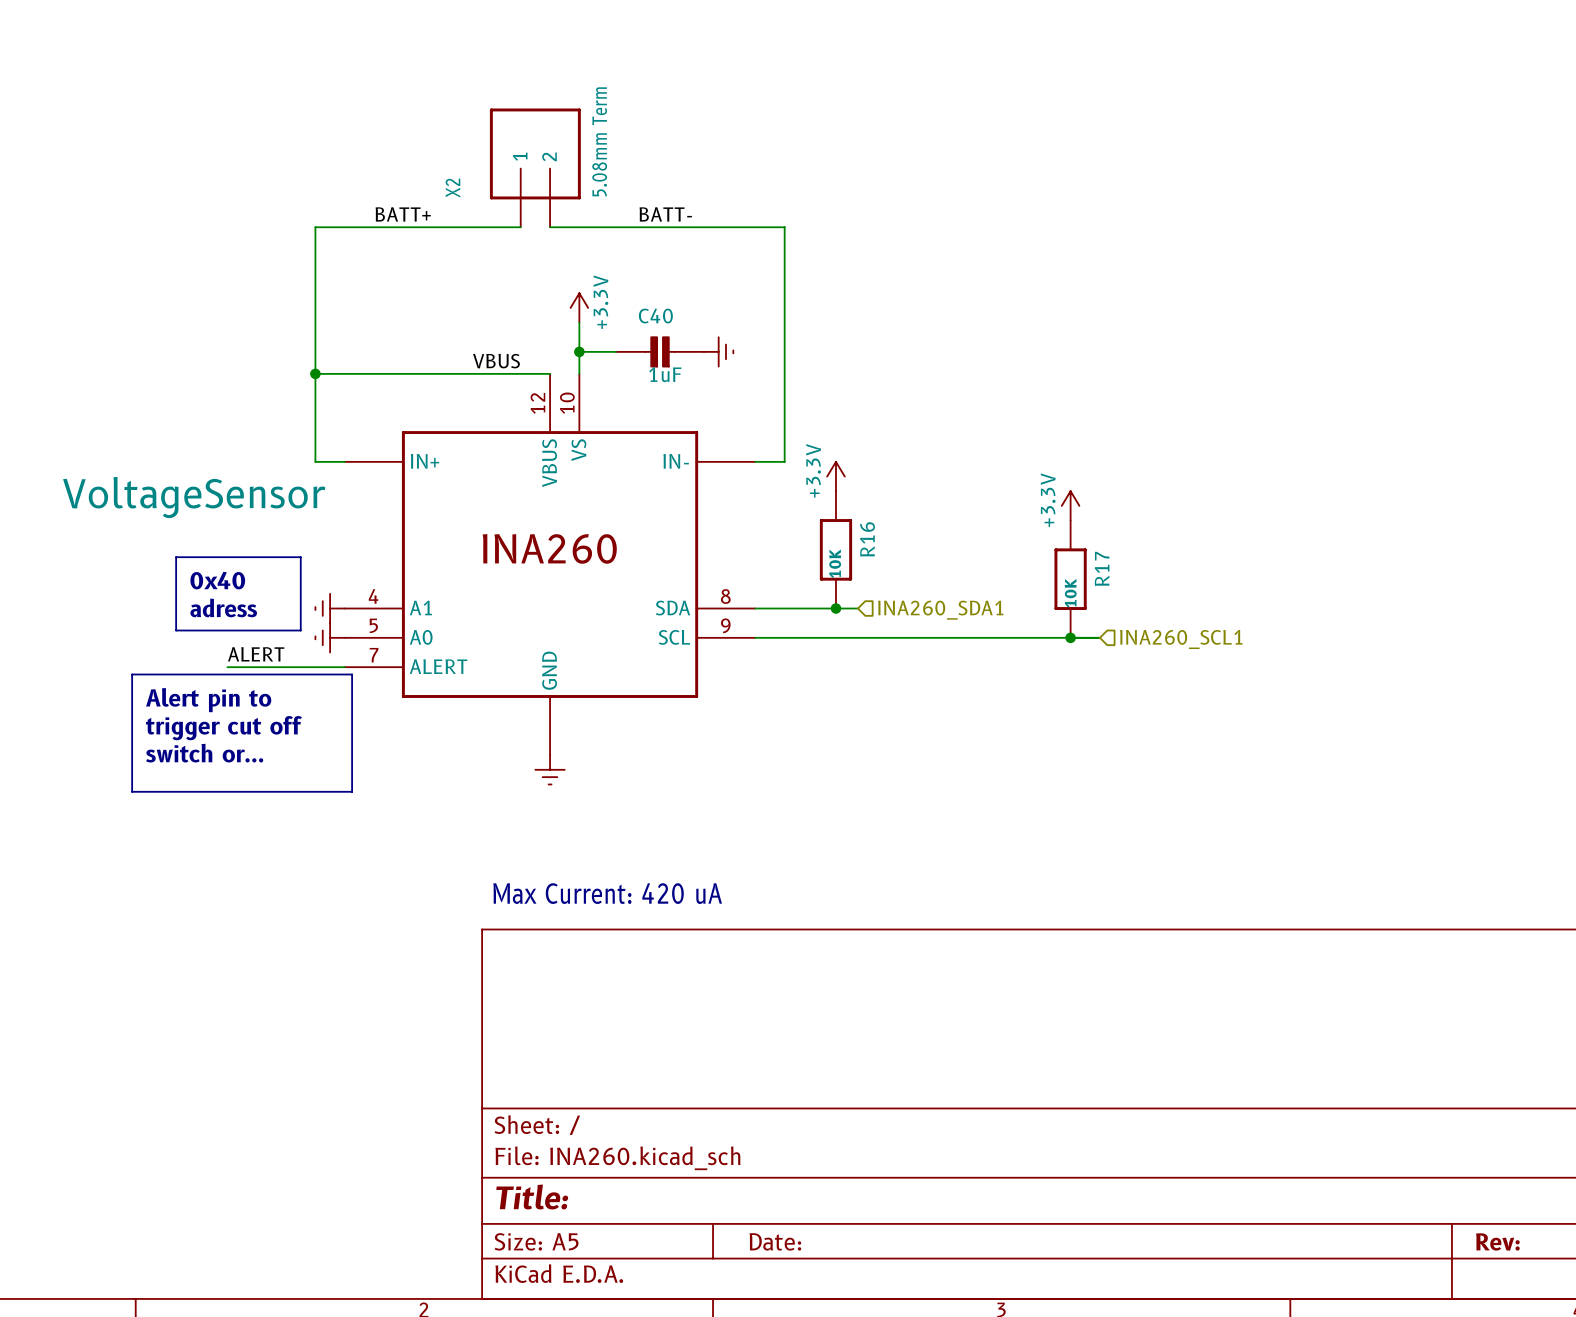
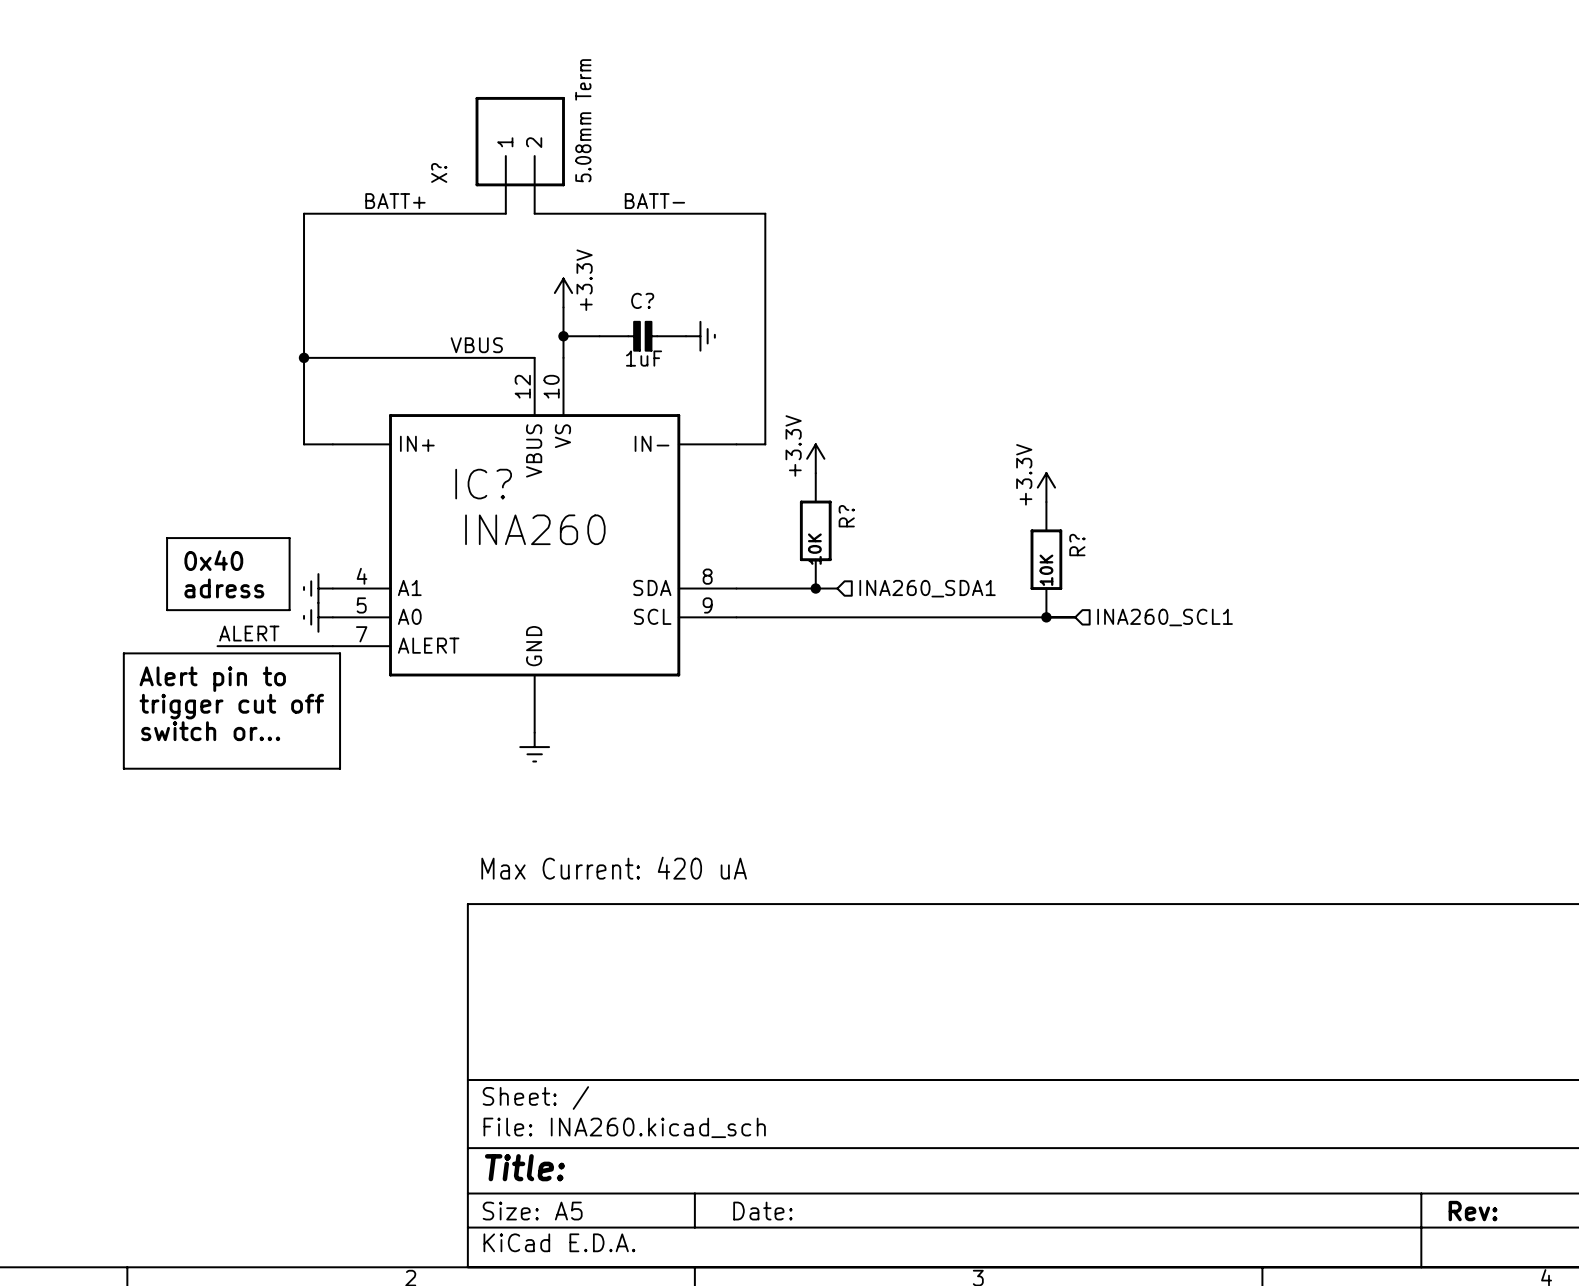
X2 name: X2 (452, 188) -> X? (439, 172)
C40 name: C40 (655, 316) -> C? (642, 300)
VoltageSensor name: VoltageSensor (194, 497) -> IC? (483, 484)
R16 name: R16 (867, 539) -> R? (846, 516)
R17 name: R17 (1102, 568) -> R? (1077, 545)

